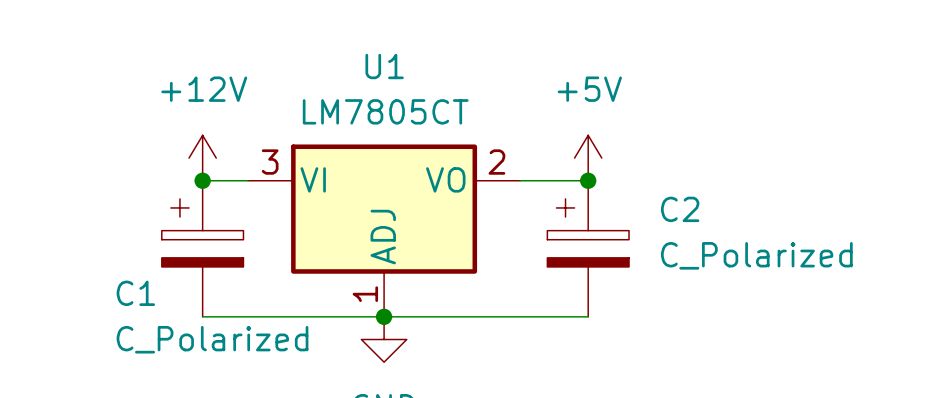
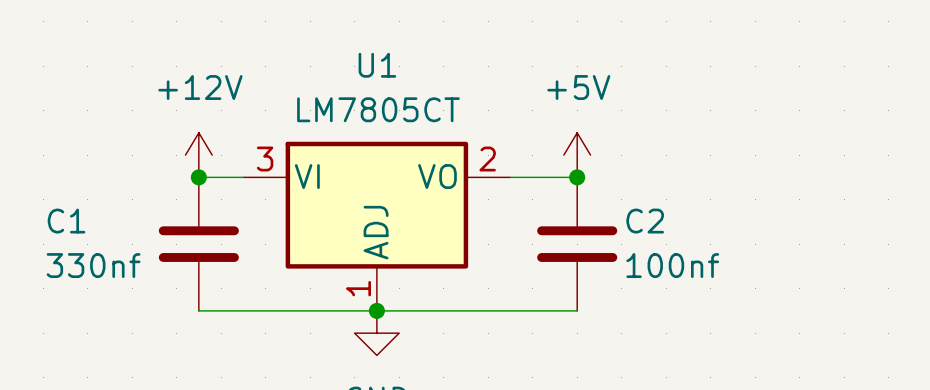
C1 symbol: [161, 180, 244, 317] -> [158, 177, 239, 311]
C2 symbol: [547, 180, 630, 317] -> [537, 177, 618, 311]
C2 value: C_Polarized (756, 255) -> 100nf (672, 265)
C1 name position: C1 (135, 293) -> C1 (66, 221)
C1 value: C_Polarized (212, 339) -> 330nf (93, 265)

